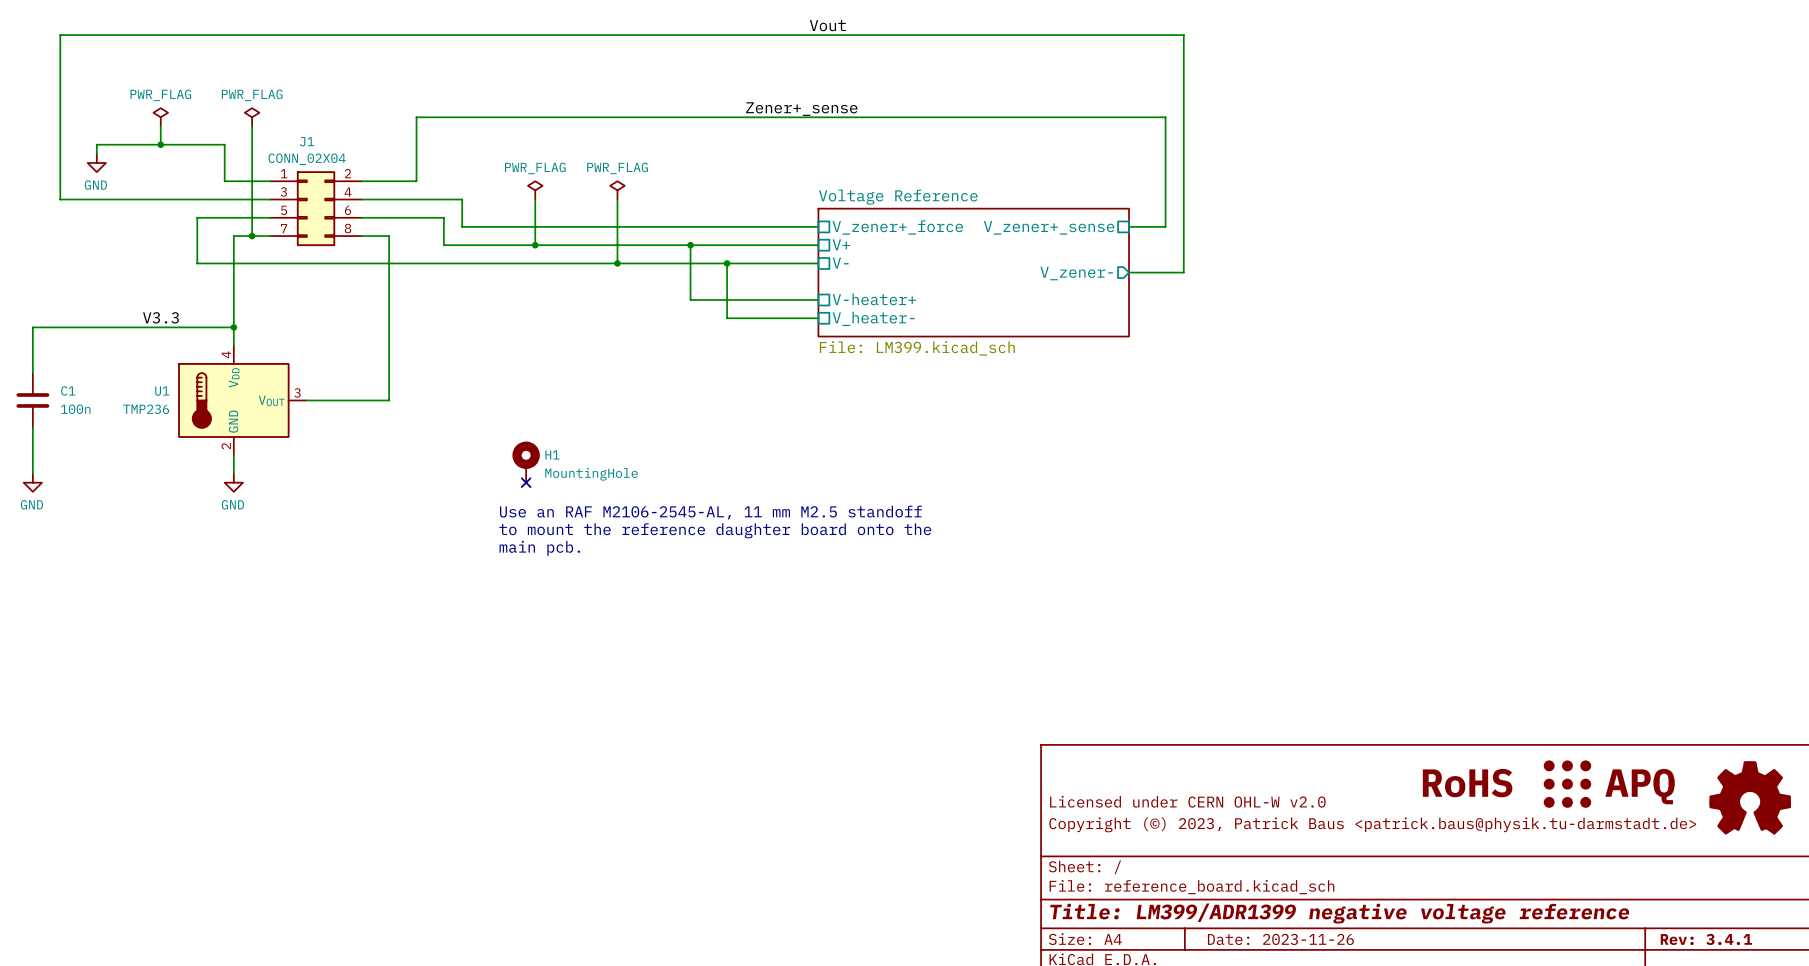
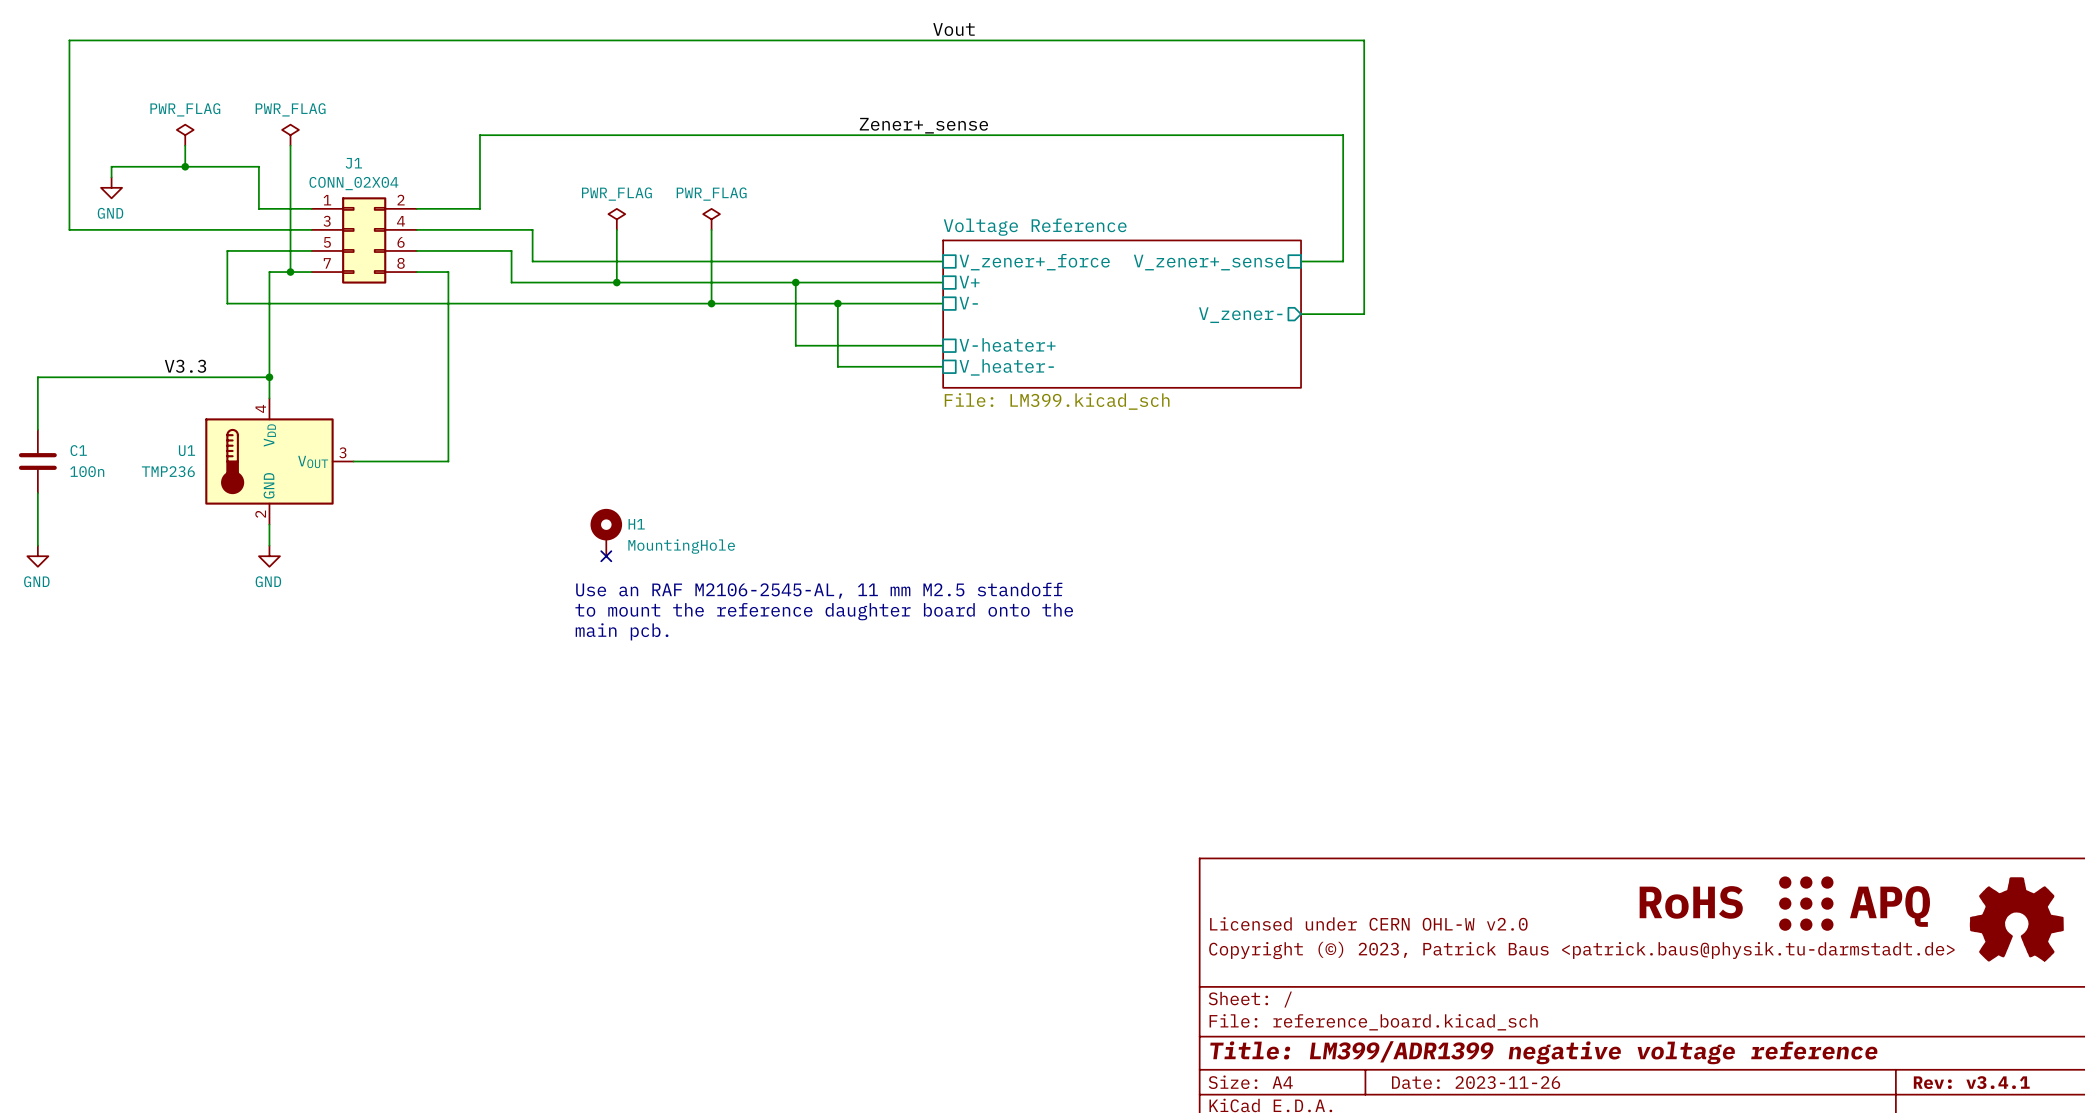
title block: Rev: 3.4.1 (1706, 939) -> Rev: v3.4.1 (1971, 1082)

